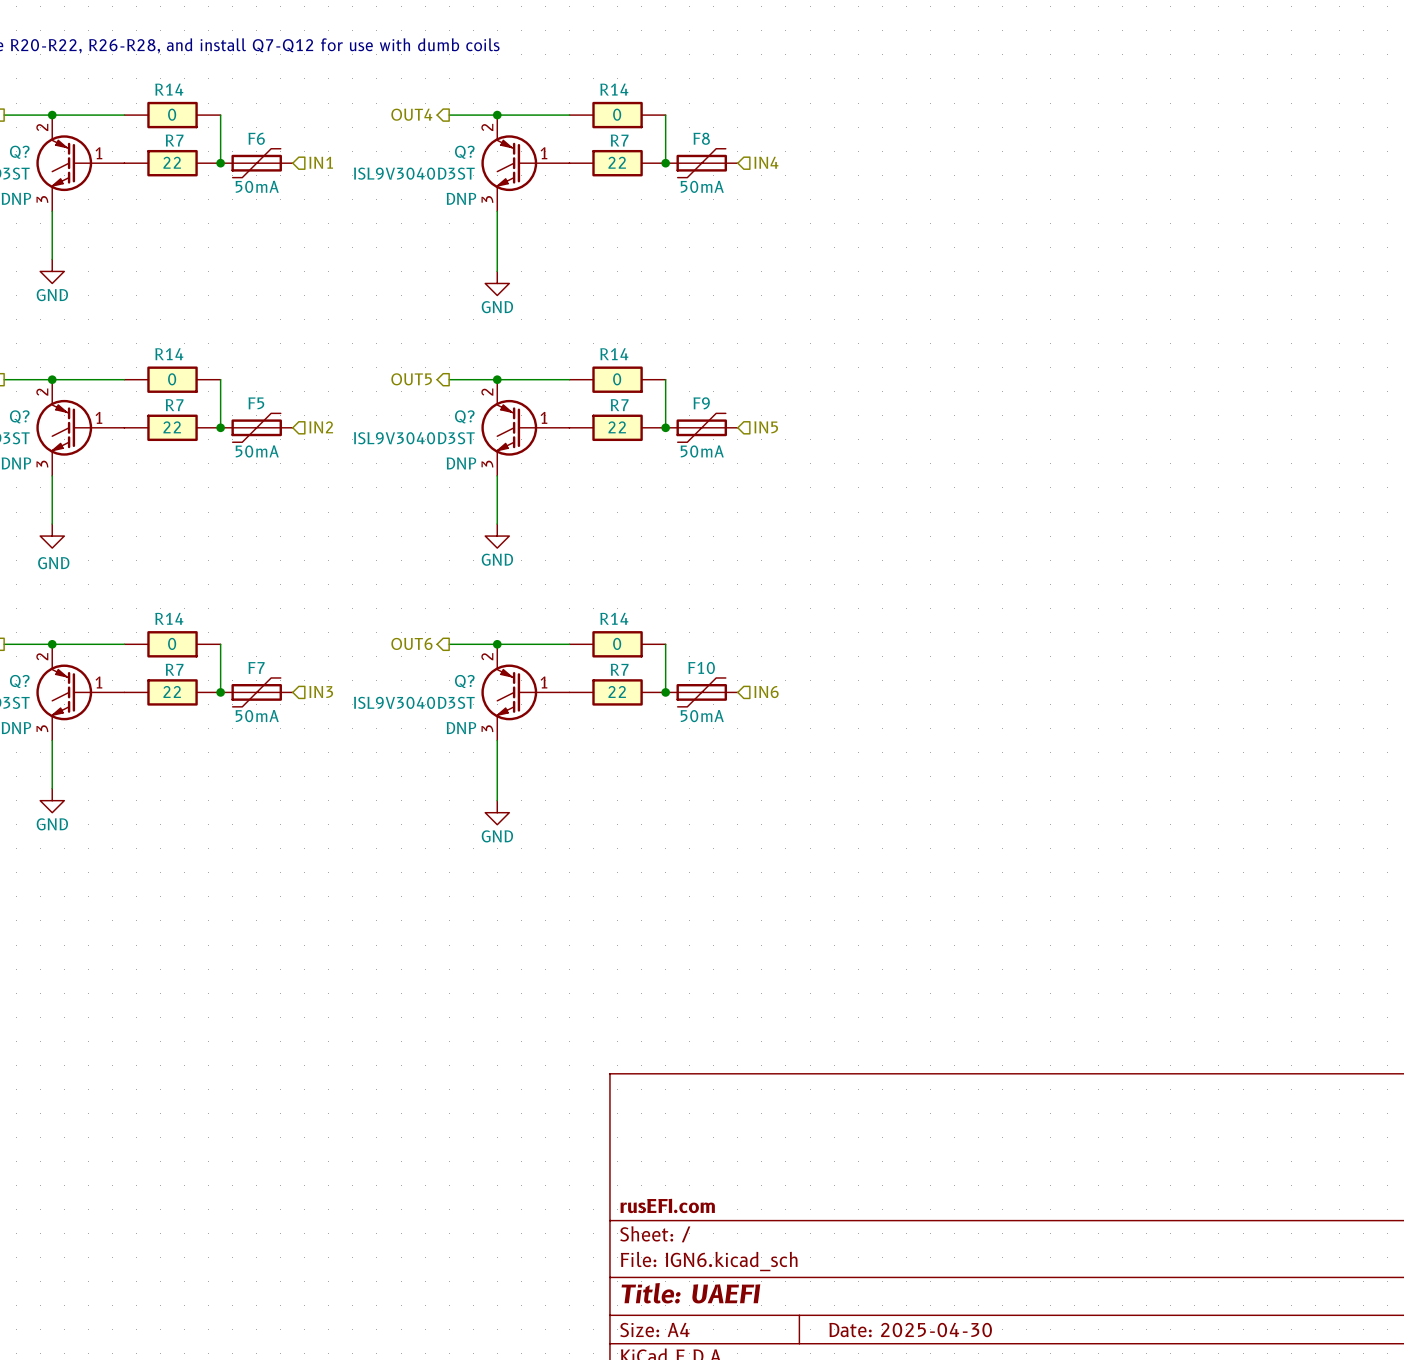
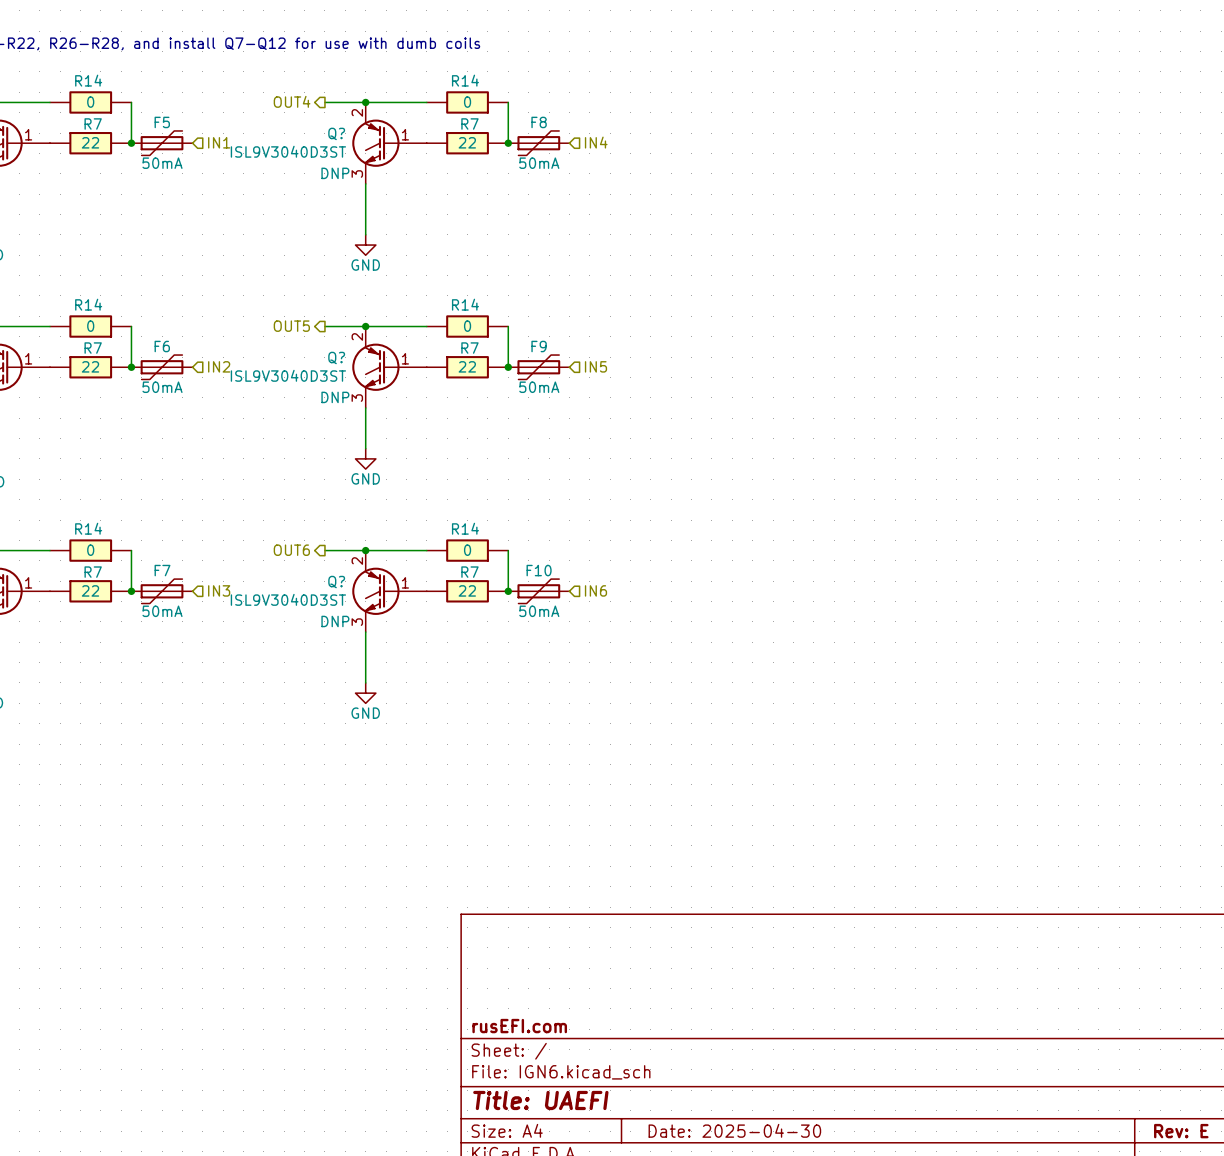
F6 name: F6 (256, 138) -> F5 (162, 122)
F5 name: F5 (256, 403) -> F6 (162, 346)

